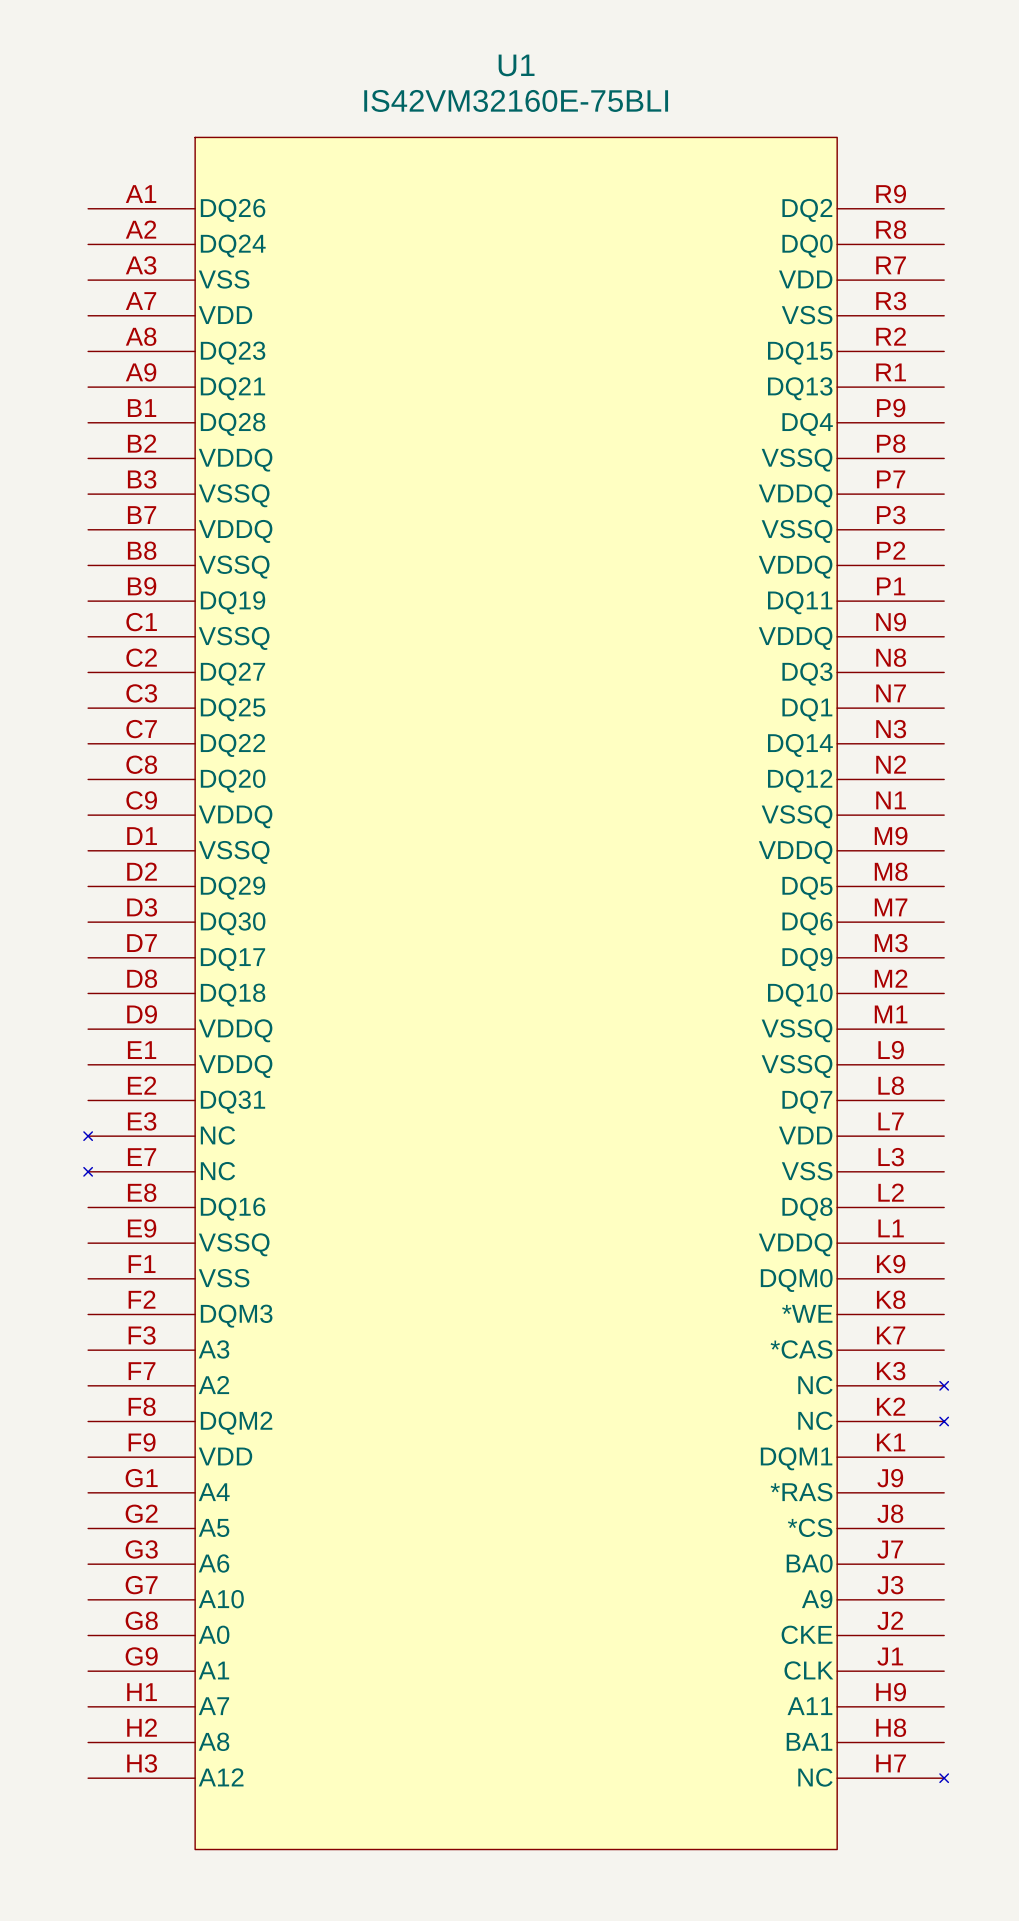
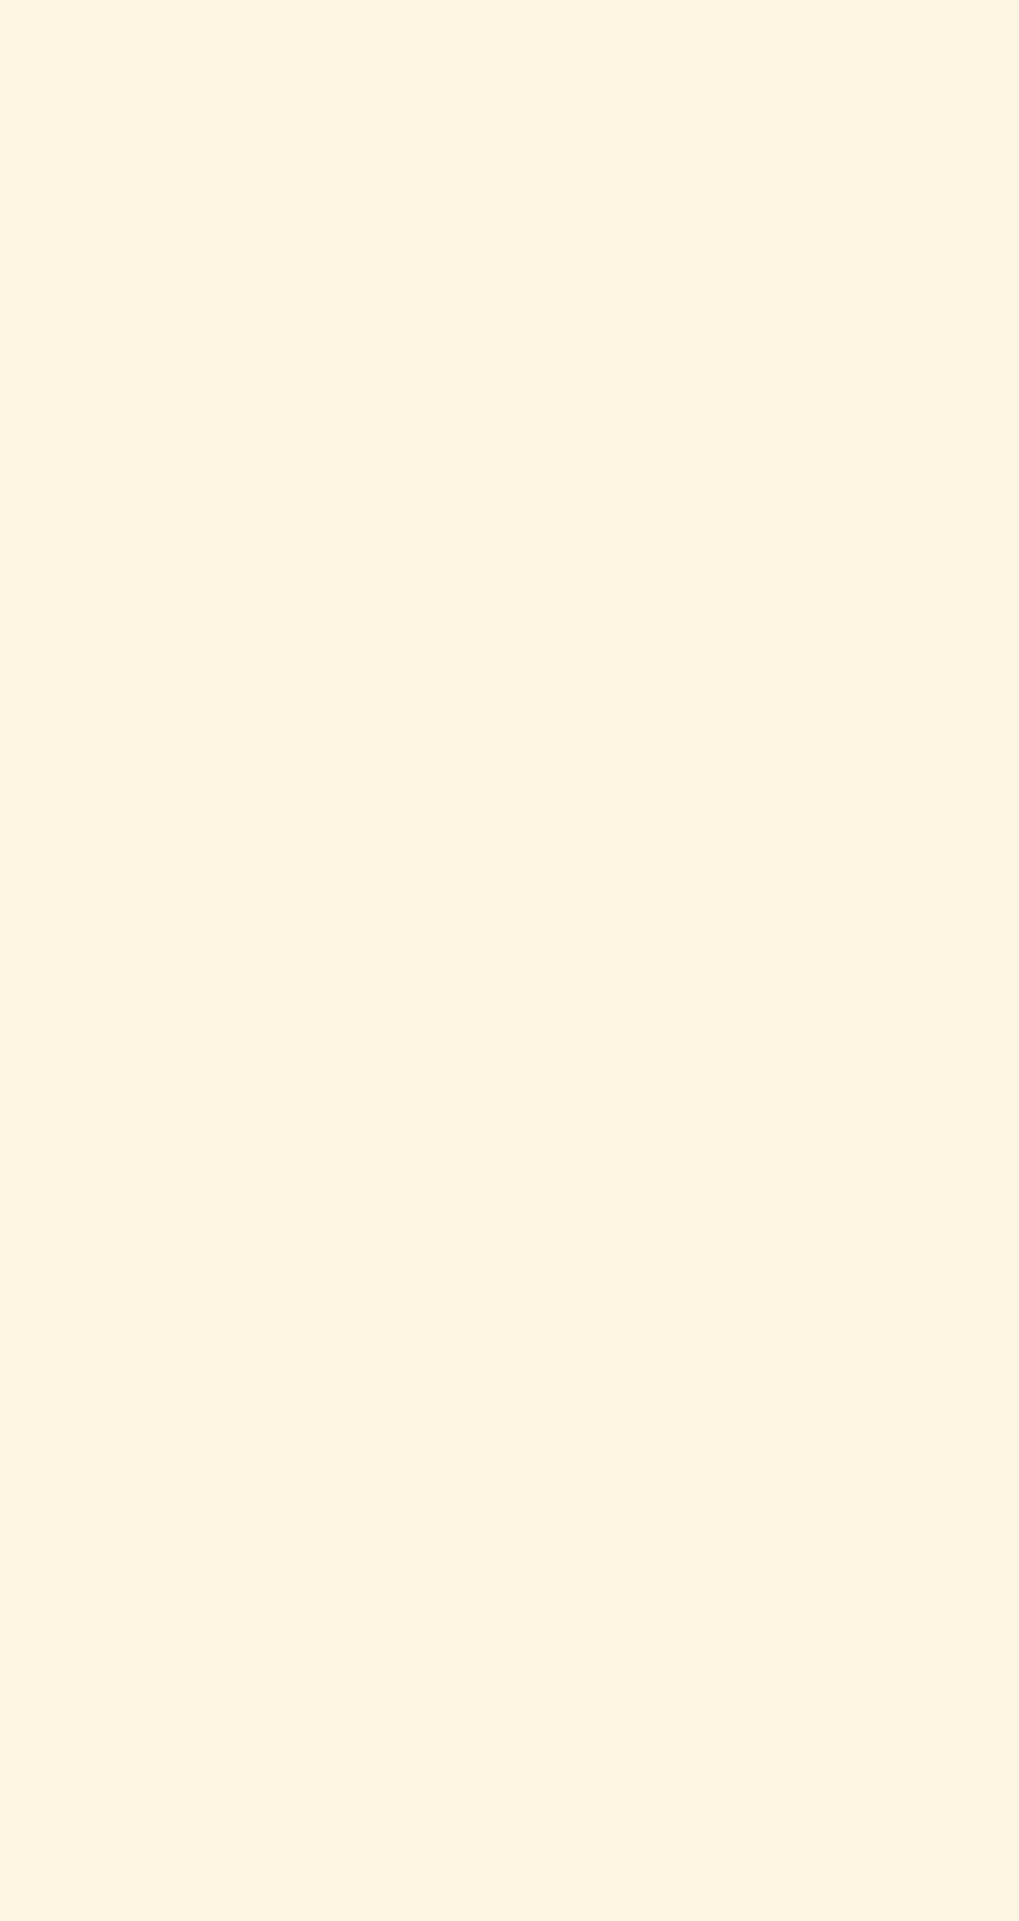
U1: IS42VM32160E-75BLI (516, 993) -> none

